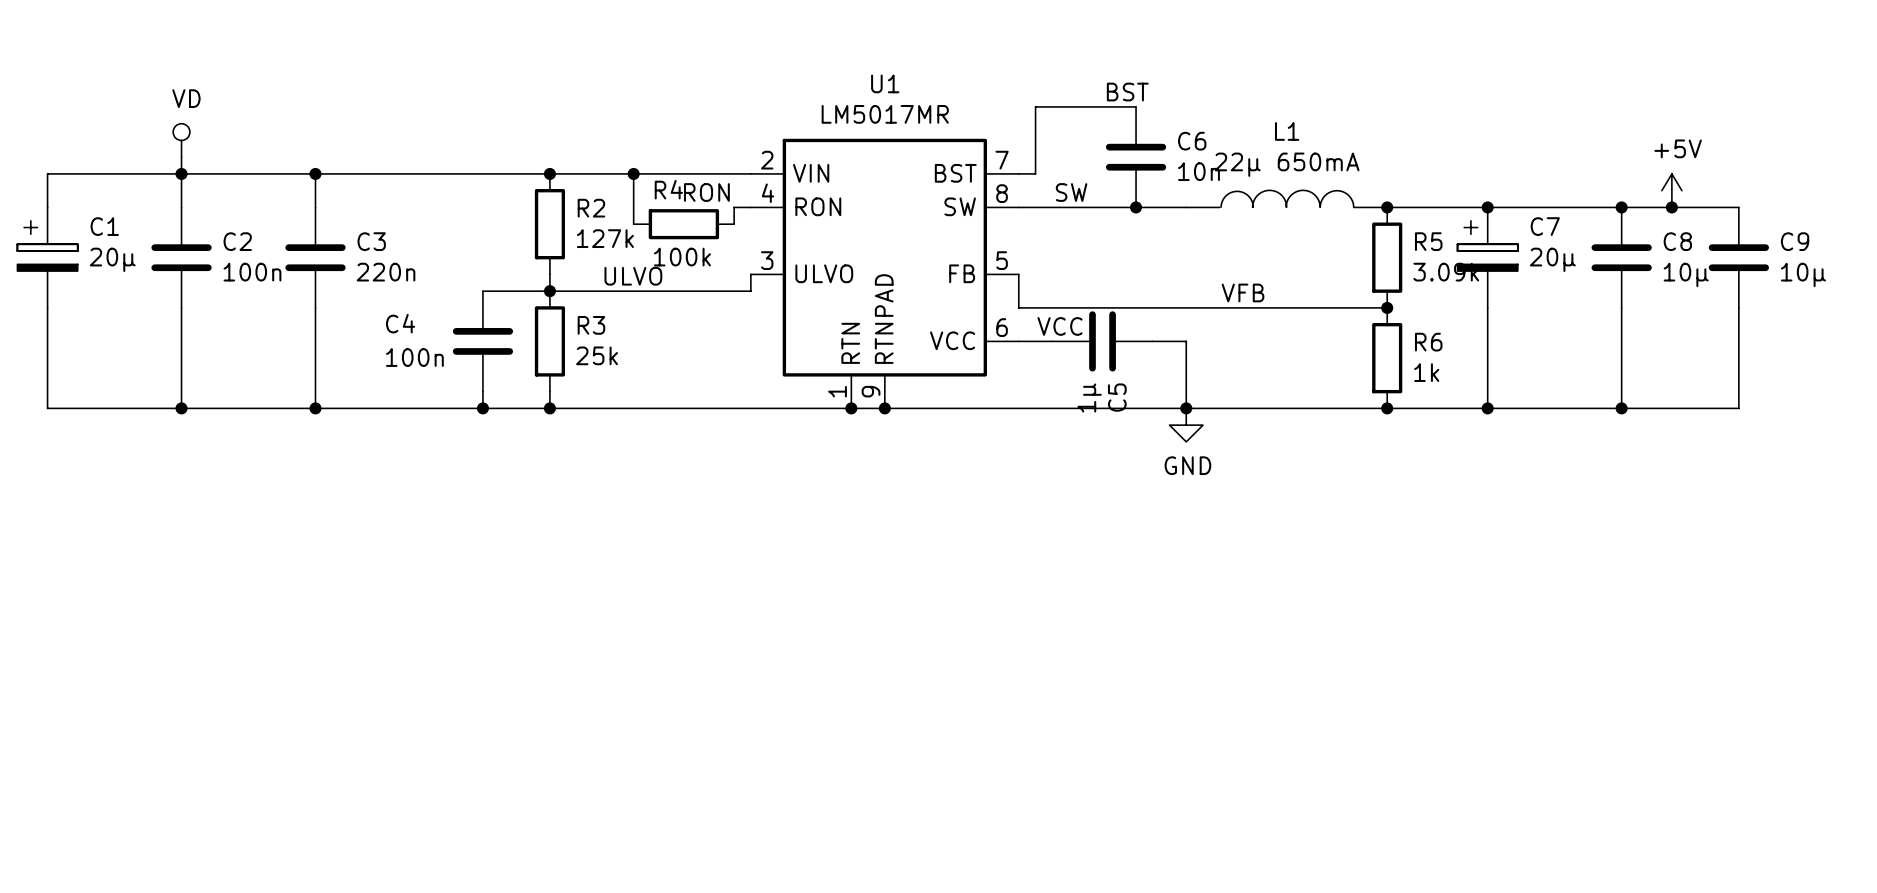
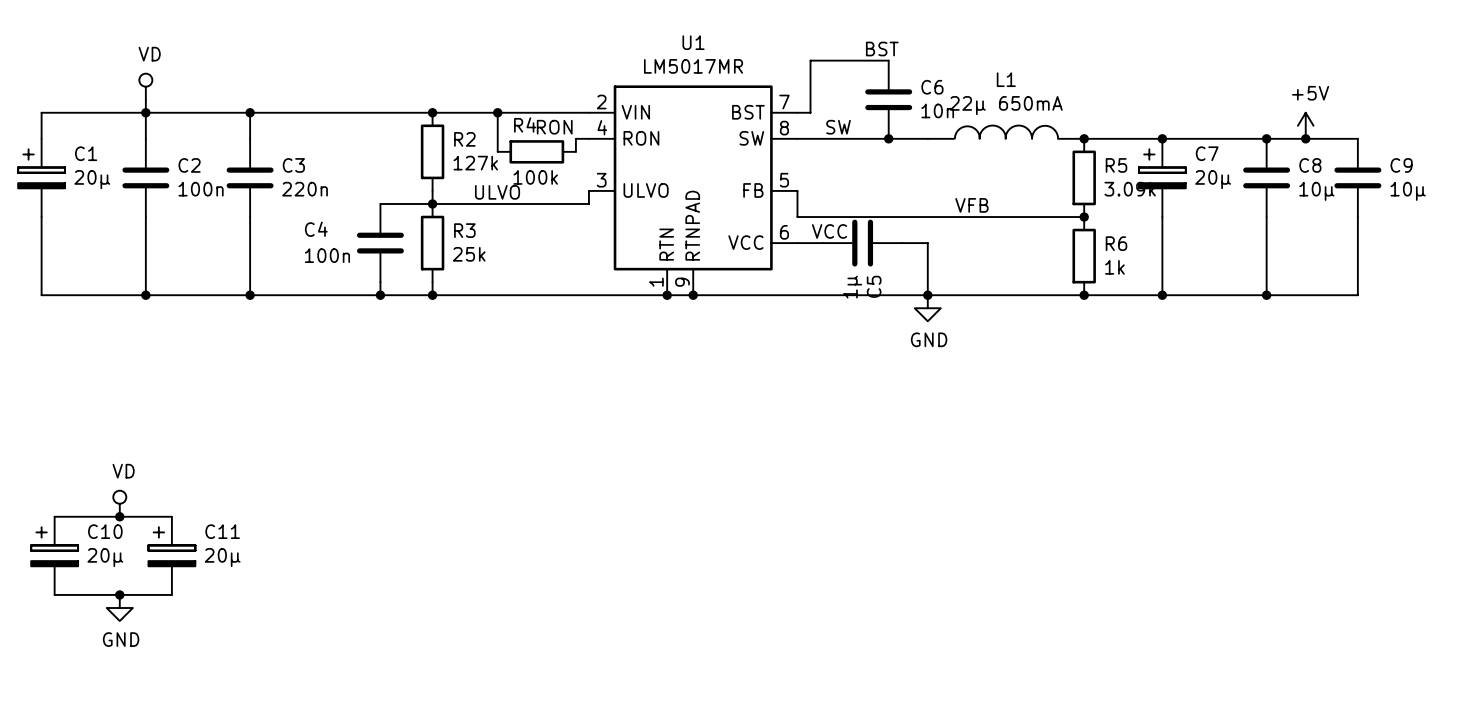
power symbol: none -> VD (119, 503)
wire: none -> (54, 516) (171, 516)
junction: none -> (119, 516)
C10: none -> 20µ (54, 555)
C11: none -> 20µ (171, 555)
wire: none -> (54, 594) (171, 594)
junction: none -> (119, 594)
power symbol: none -> GND (119, 607)

